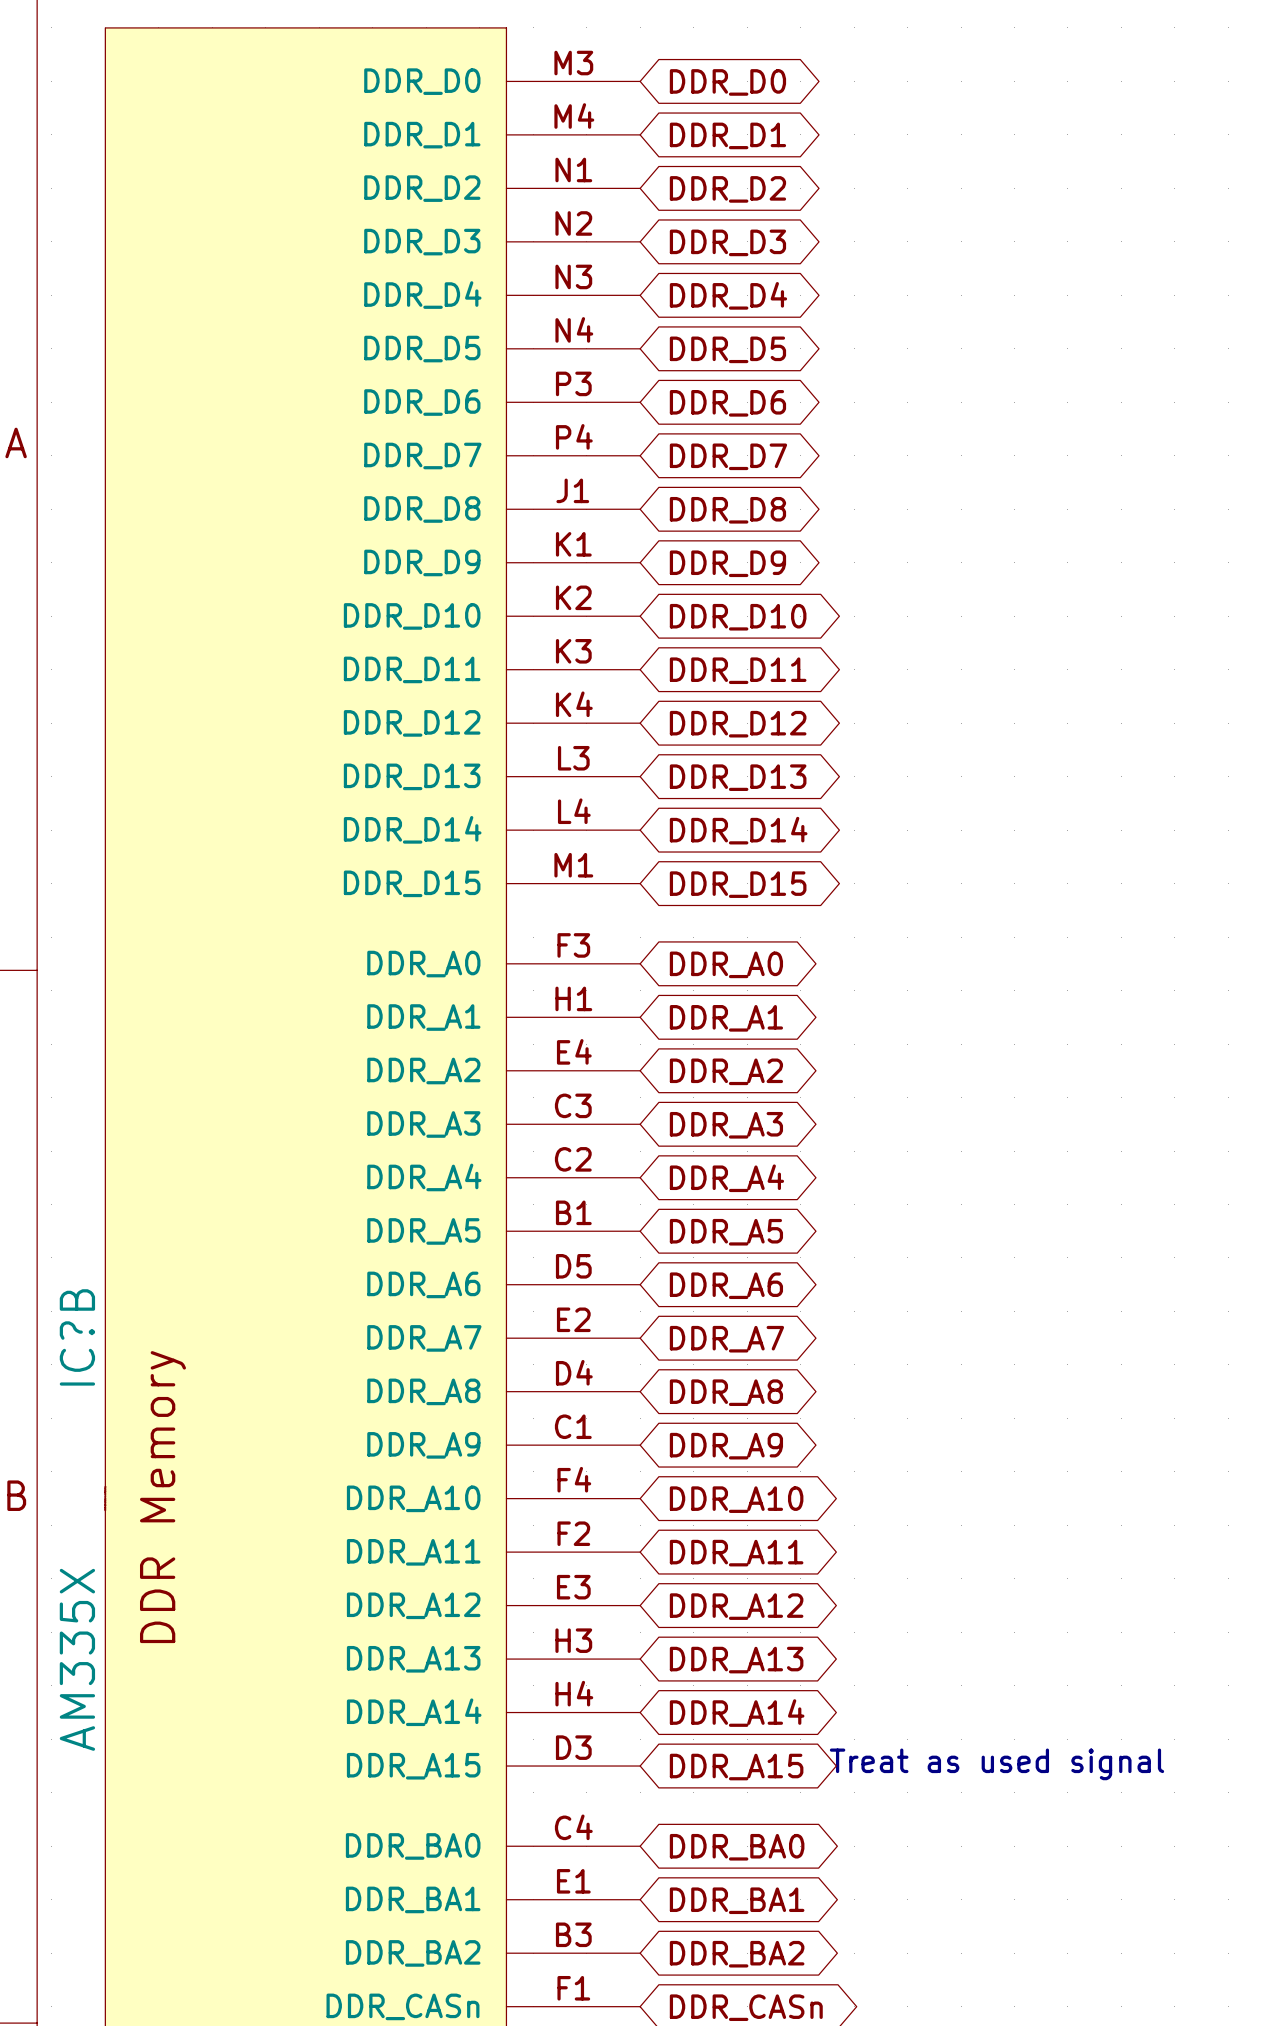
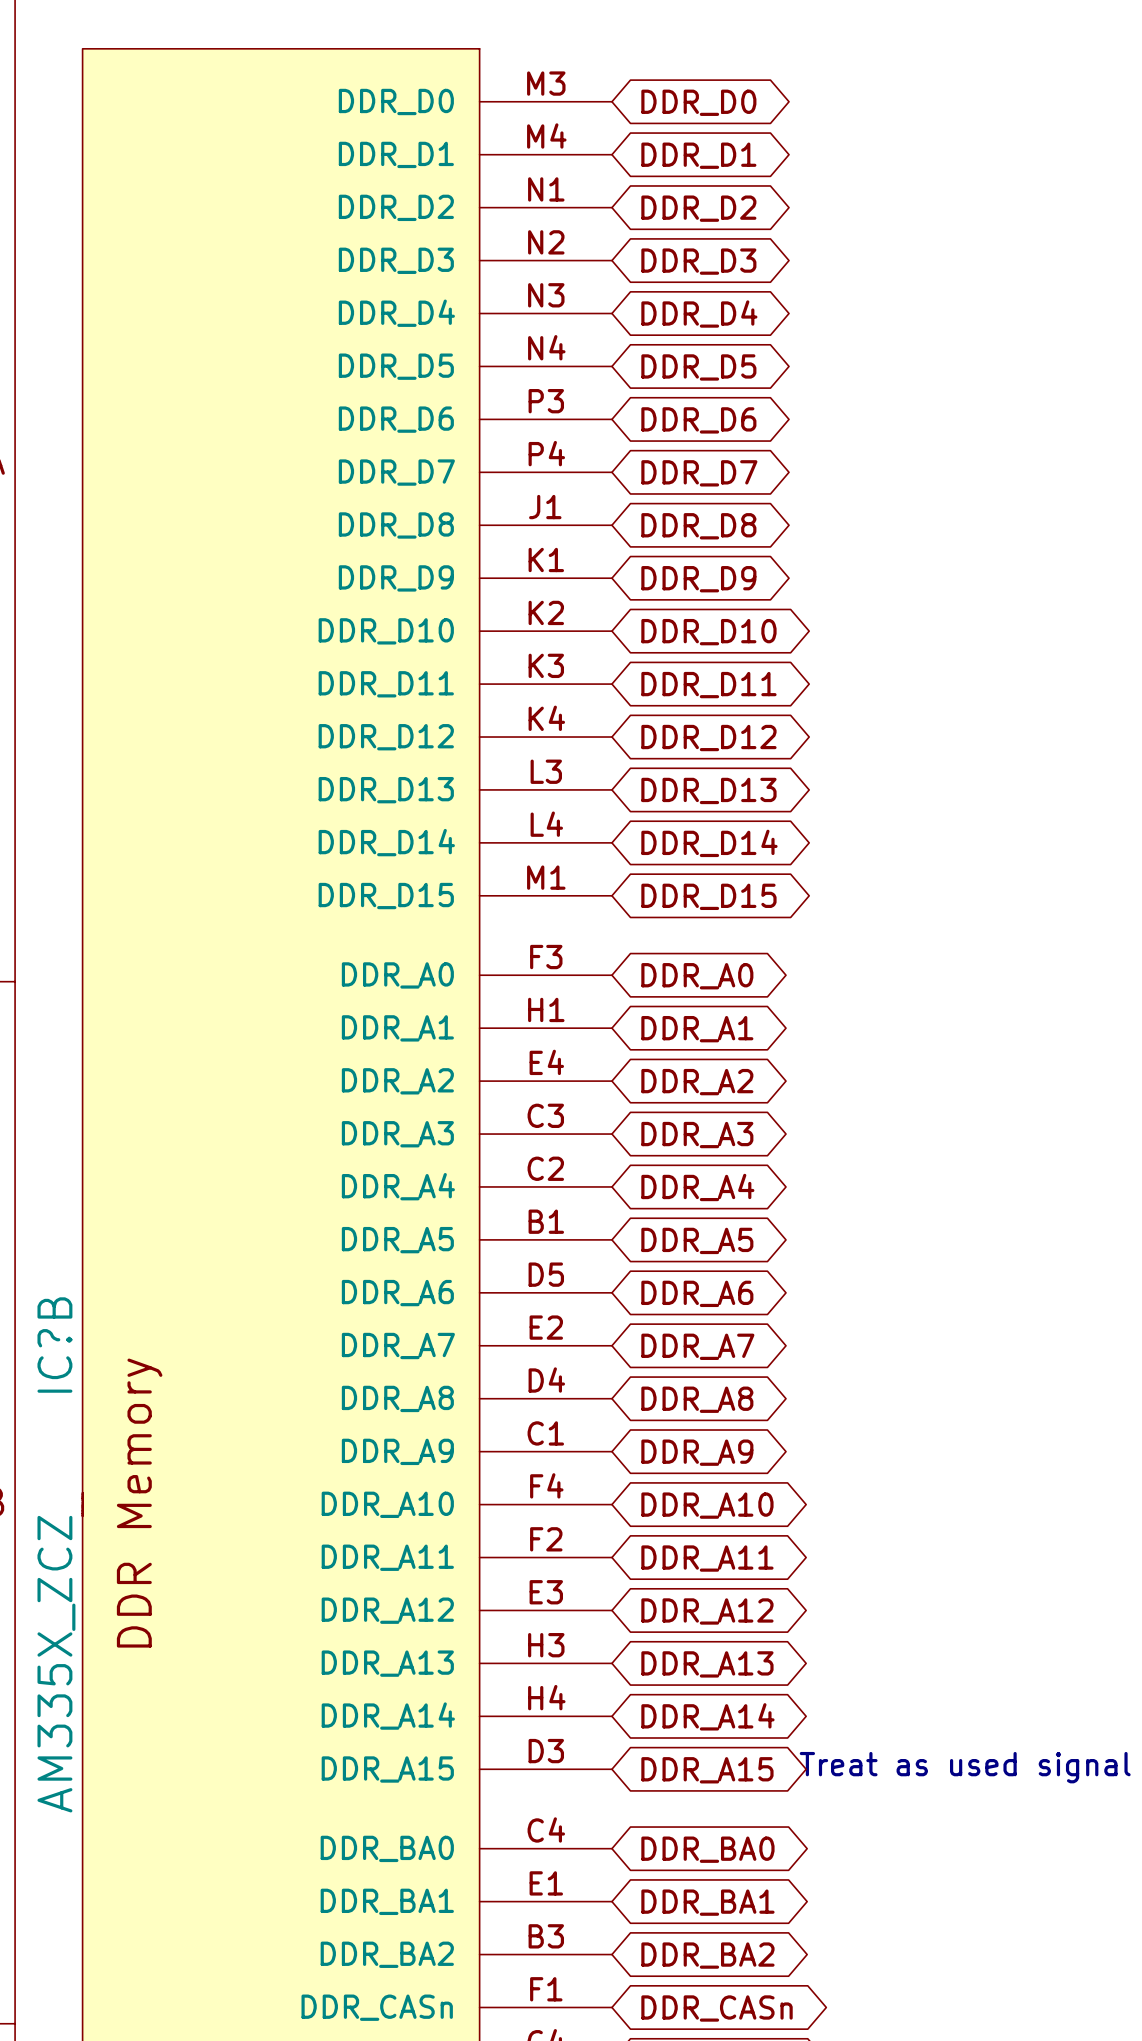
IC?B value: AM335X (77, 1659) -> AM335X_ZCZ (56, 1664)

